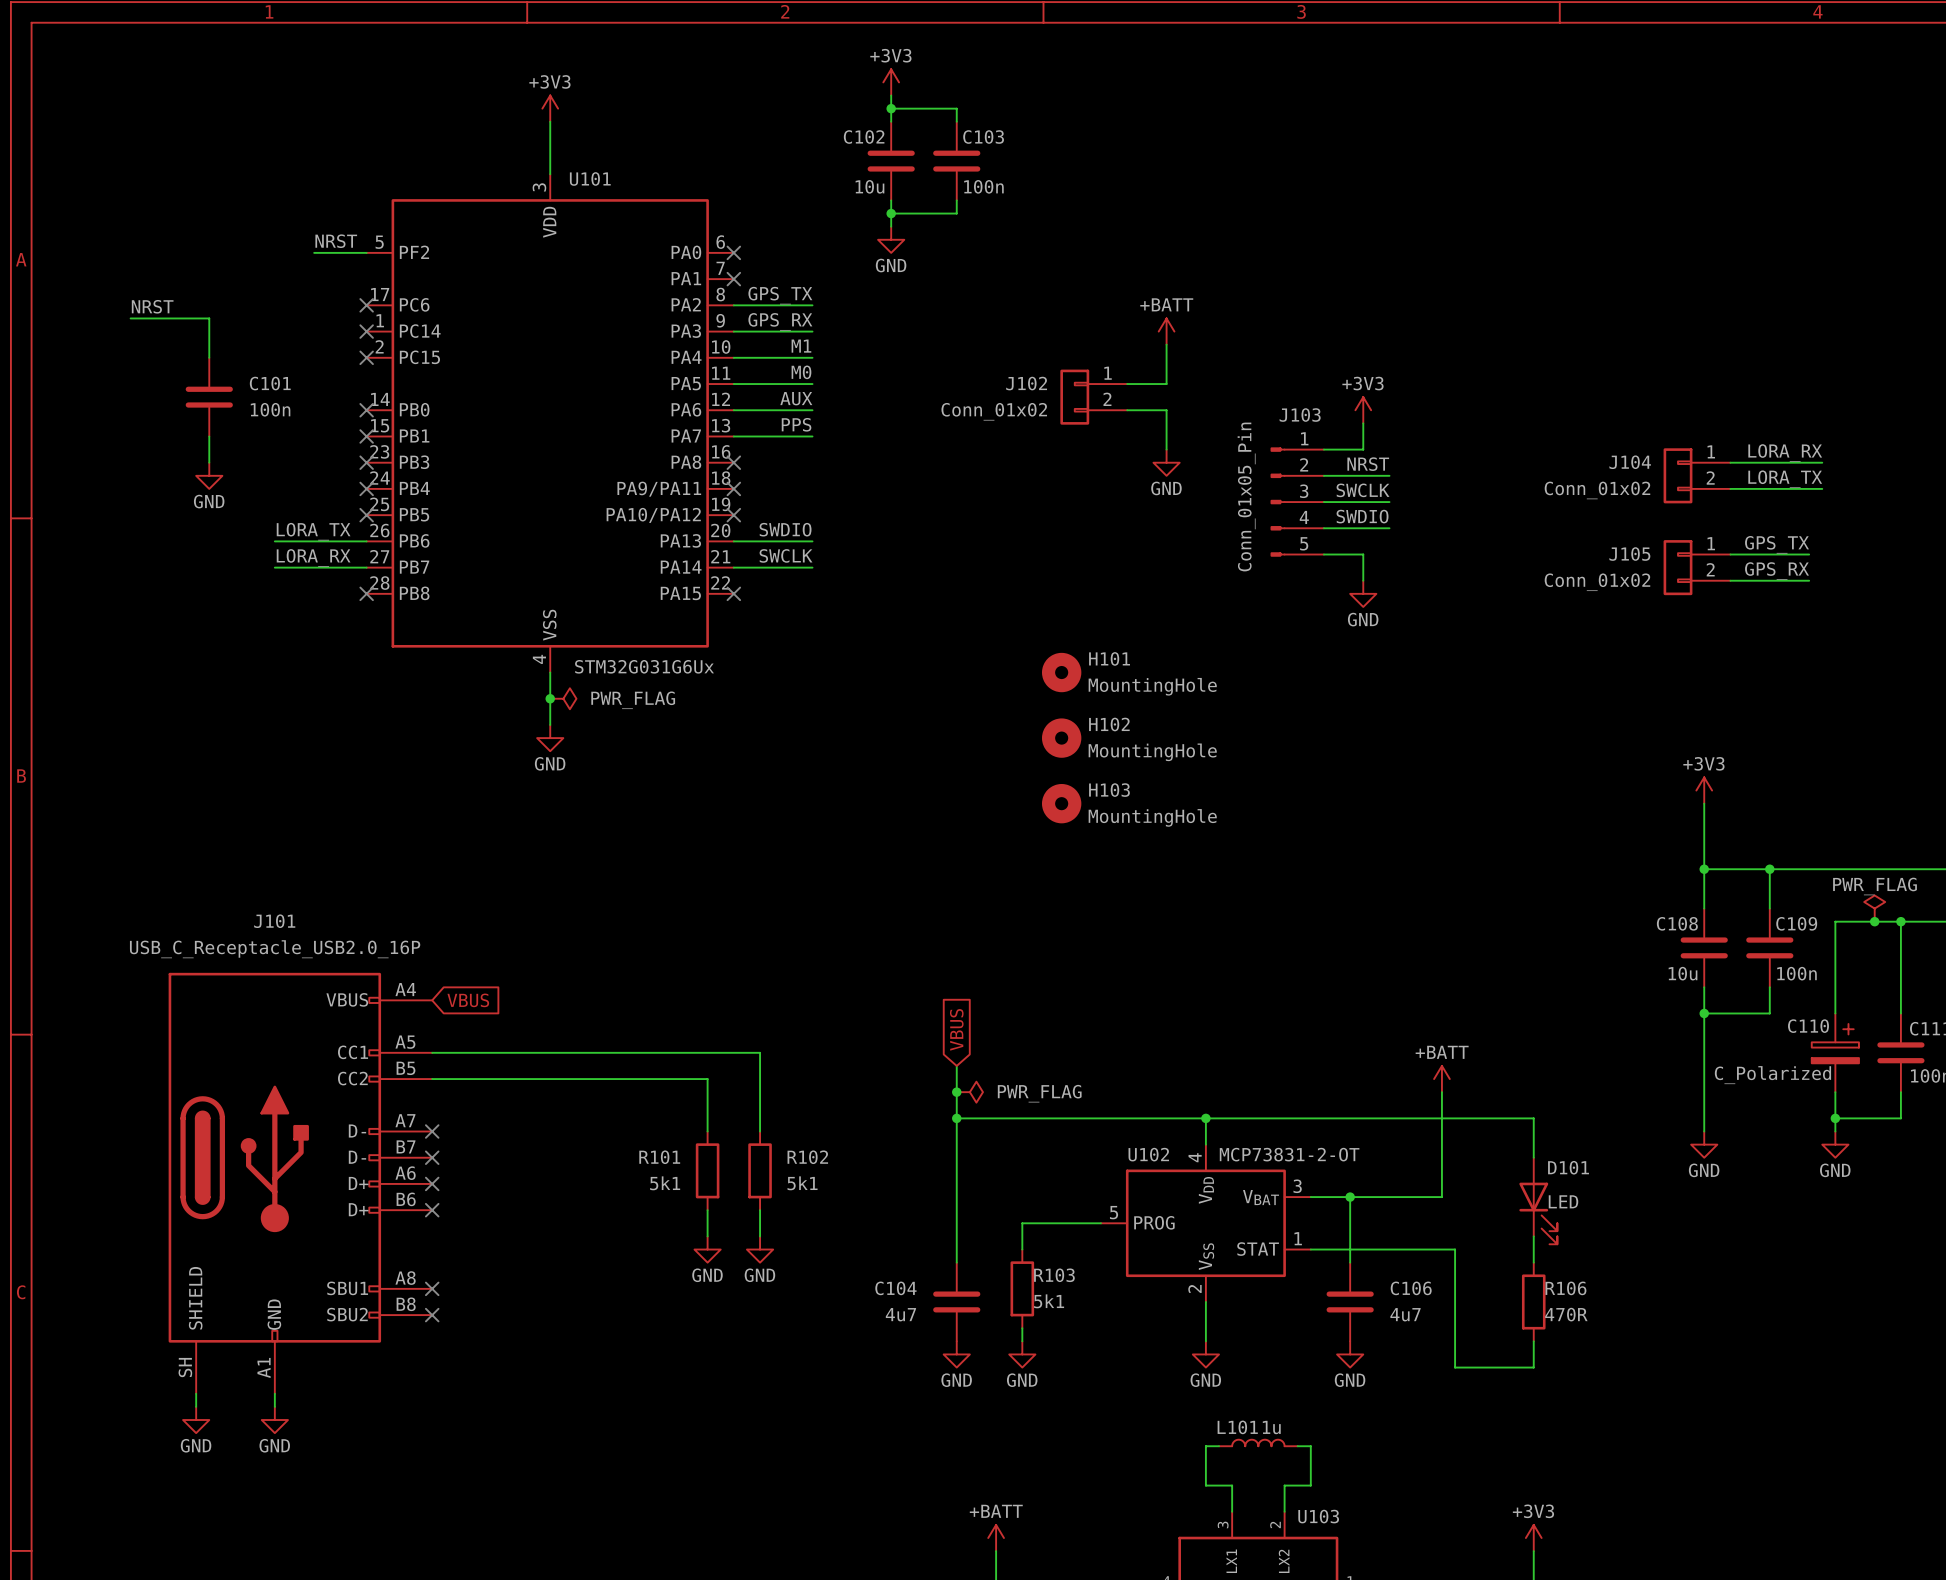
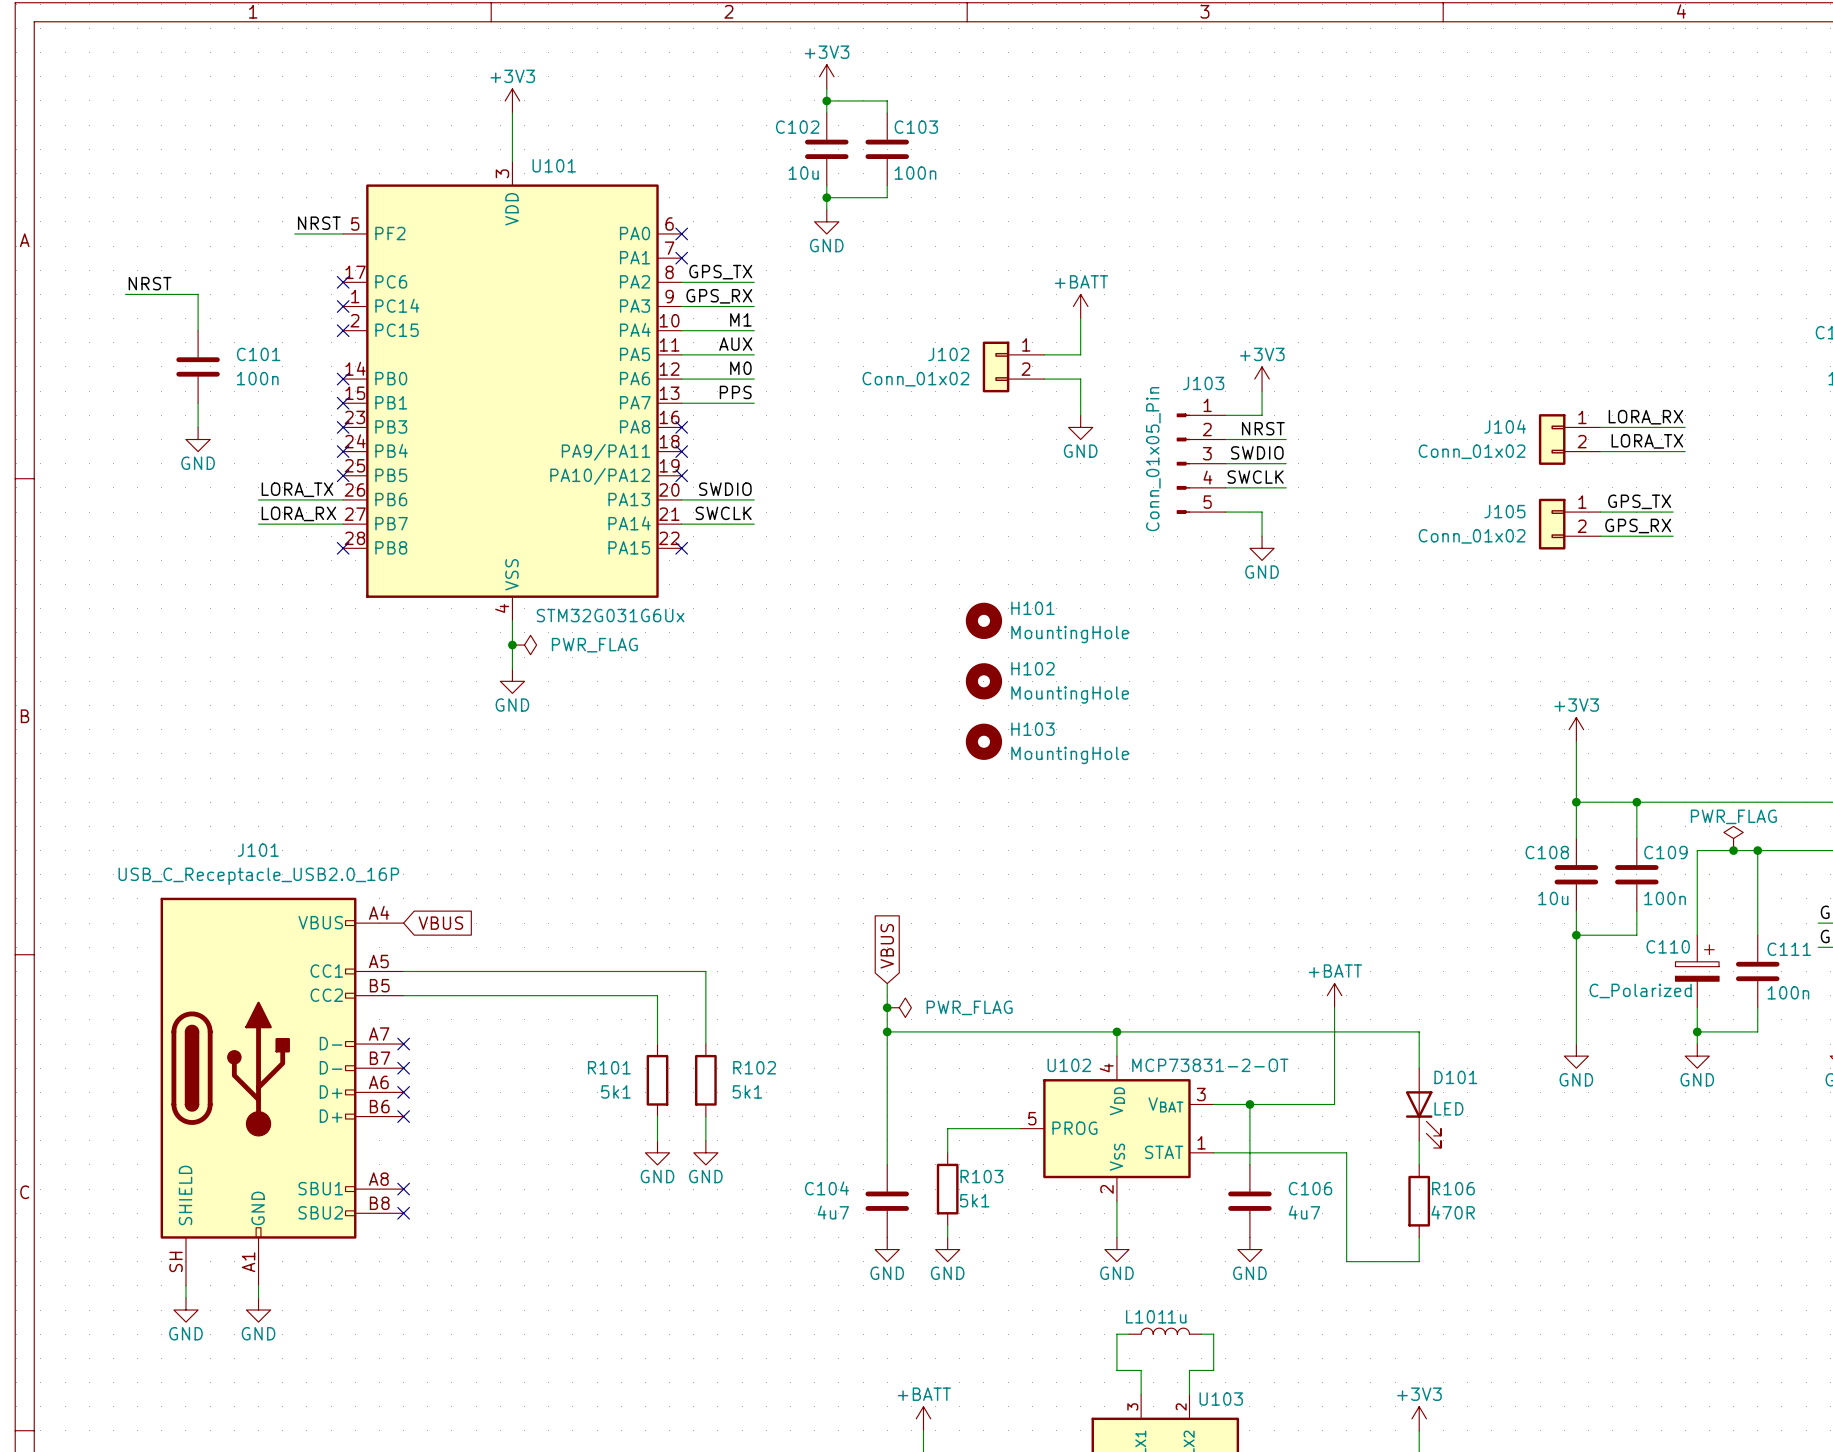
label: M0 (801, 372) -> AUX (735, 344)
label: AUX (796, 398) -> M0 (740, 368)
label: SWCLK (1363, 490) -> SWDIO (1257, 452)
label: SWDIO (1362, 516) -> SWCLK (1255, 477)

